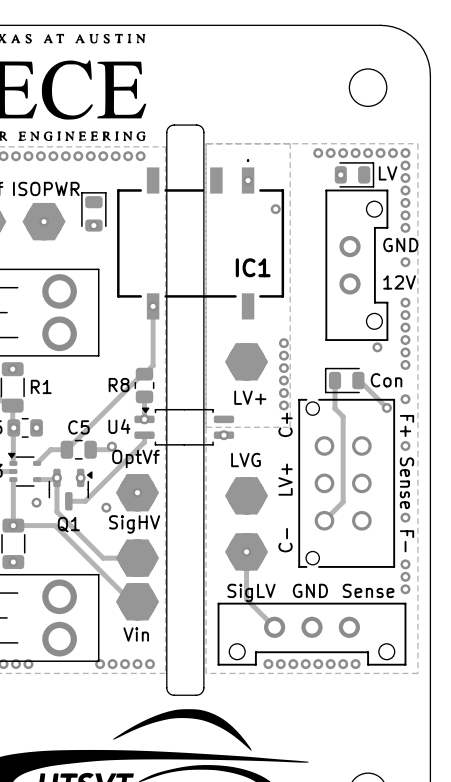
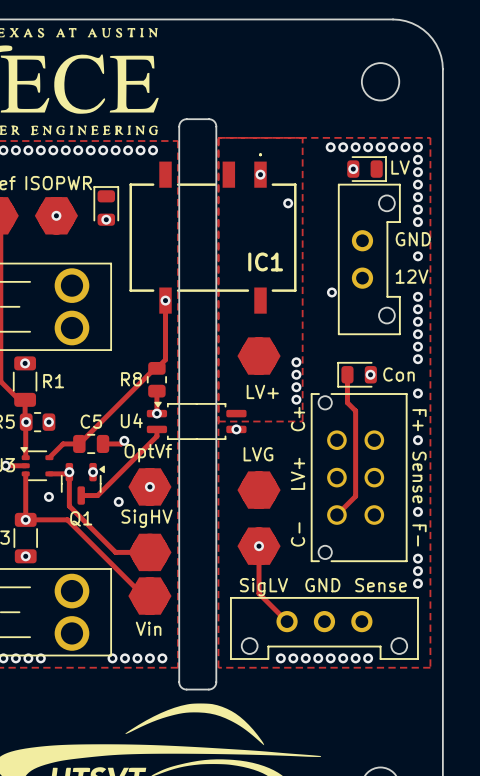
via: none -> (331, 292)
via: (283, 343) -> none
via: (377, 347) -> none
via: (283, 355) -> none
track: (358, 380) (386, 407) -> none
via: none -> (370, 374)
via: (386, 407) -> none

